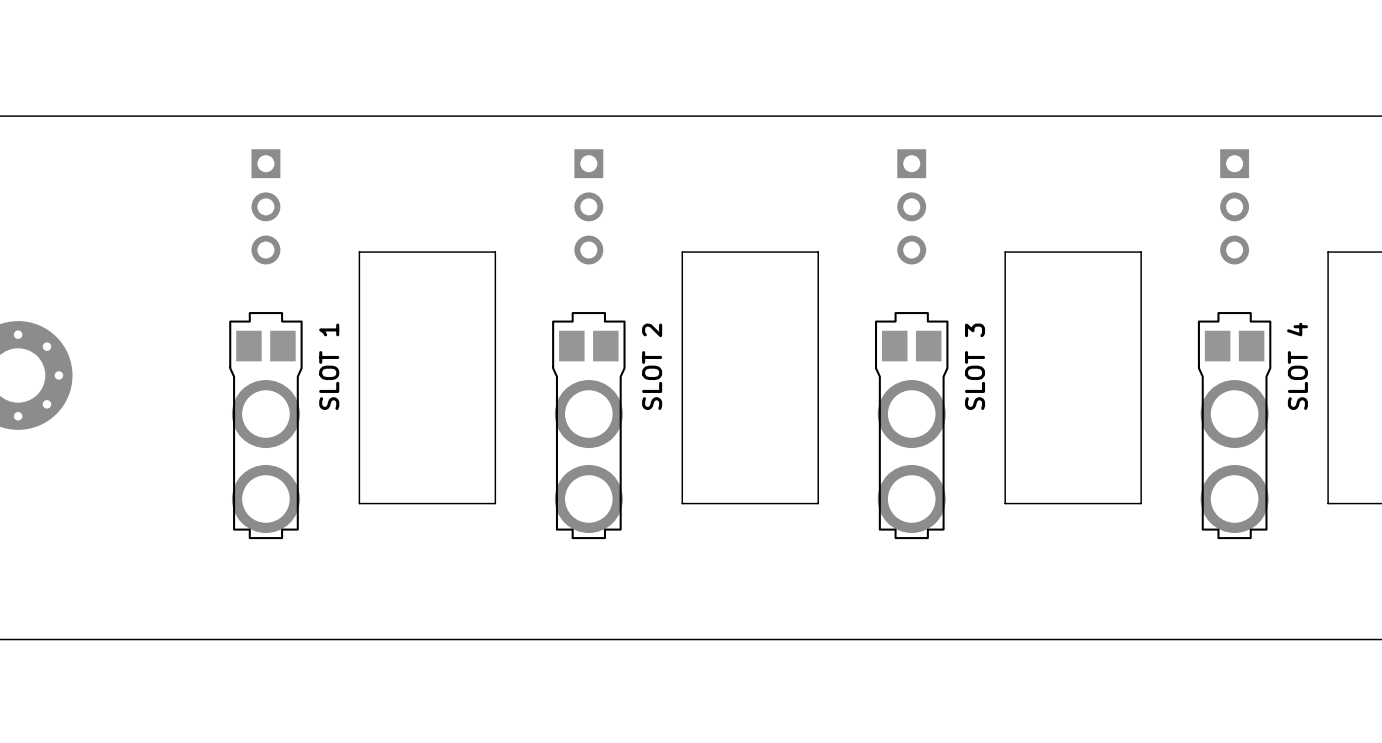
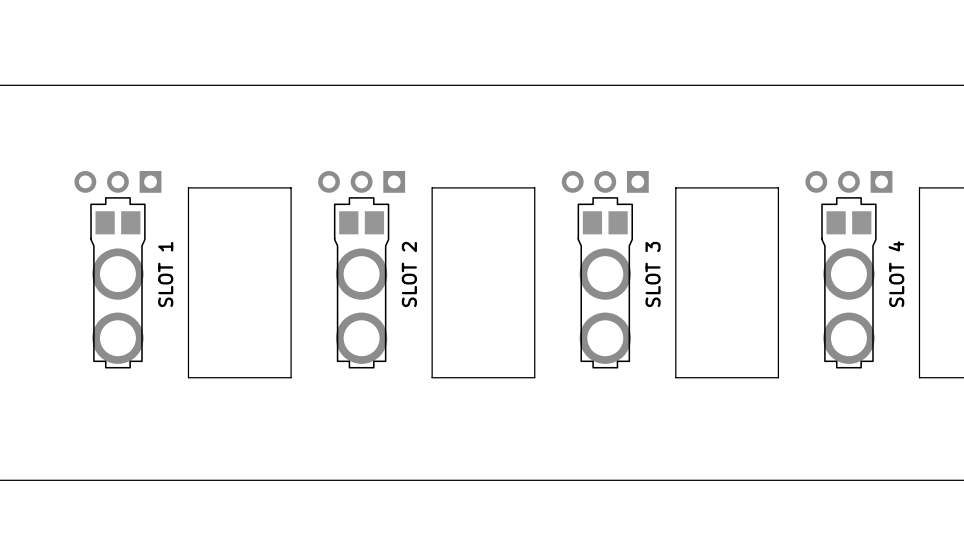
part rotation: 0° (265, 206) -> 90° clockwise (117, 181)
part rotation: 0° (588, 206) -> 90° clockwise (361, 181)
part rotation: 0° (911, 206) -> 90° clockwise (605, 181)
part rotation: 0° (1234, 206) -> 90° clockwise (848, 181)
part position: (265, 425) -> (117, 282)
part position: (588, 425) -> (361, 282)
part position: (911, 425) -> (605, 282)
part position: (1234, 425) -> (848, 282)

